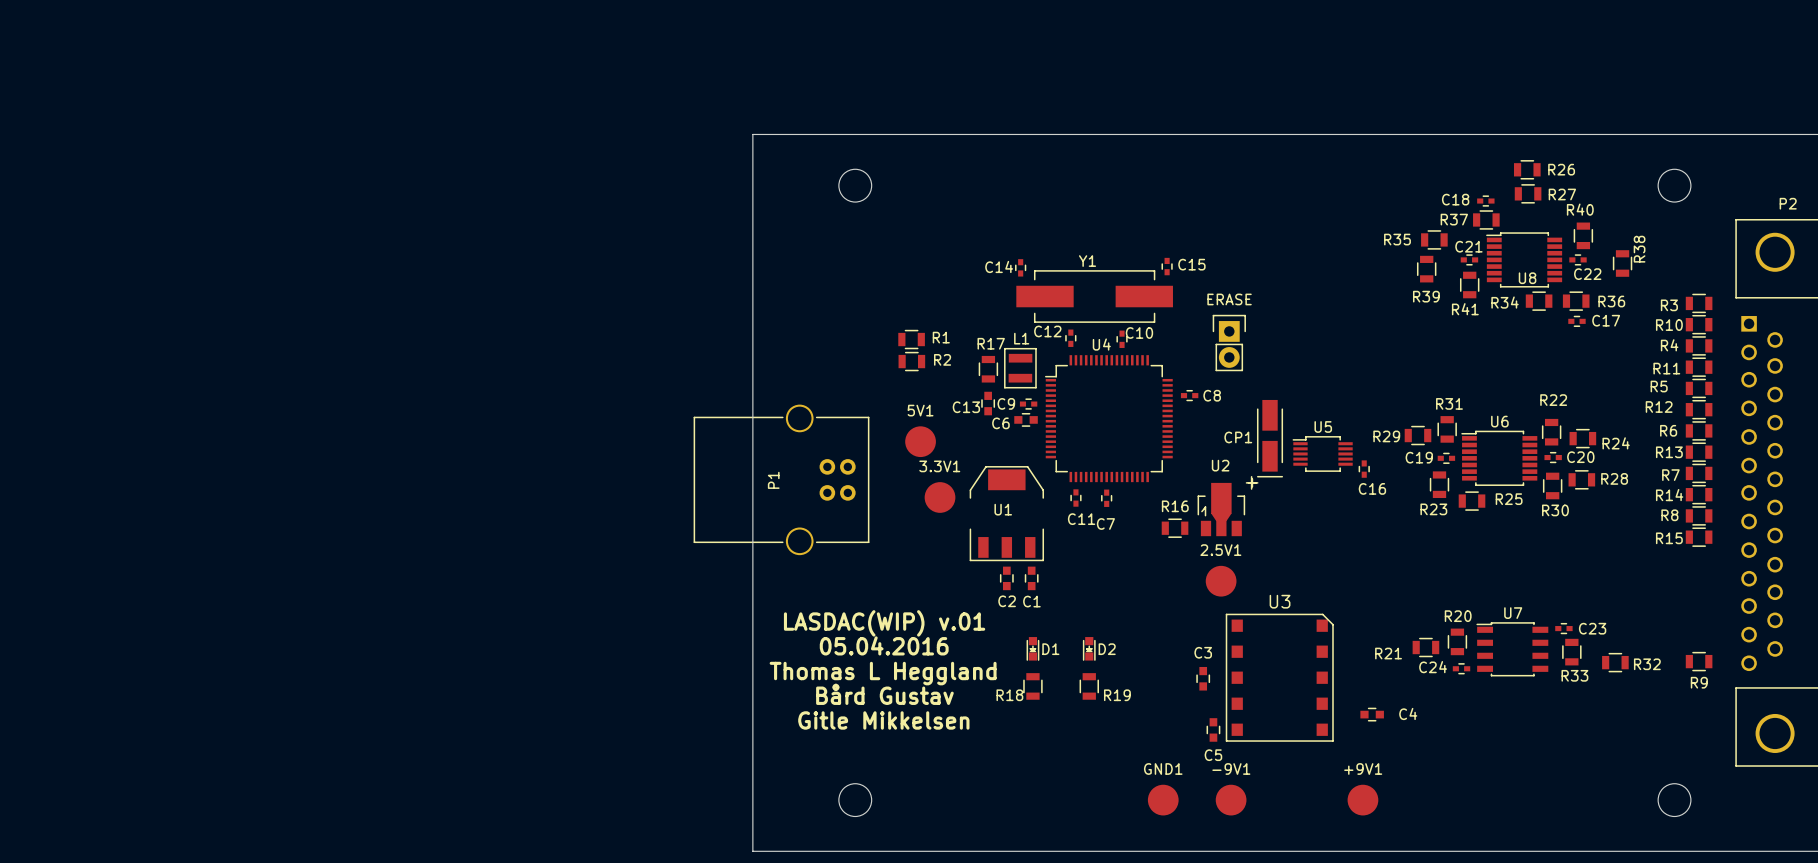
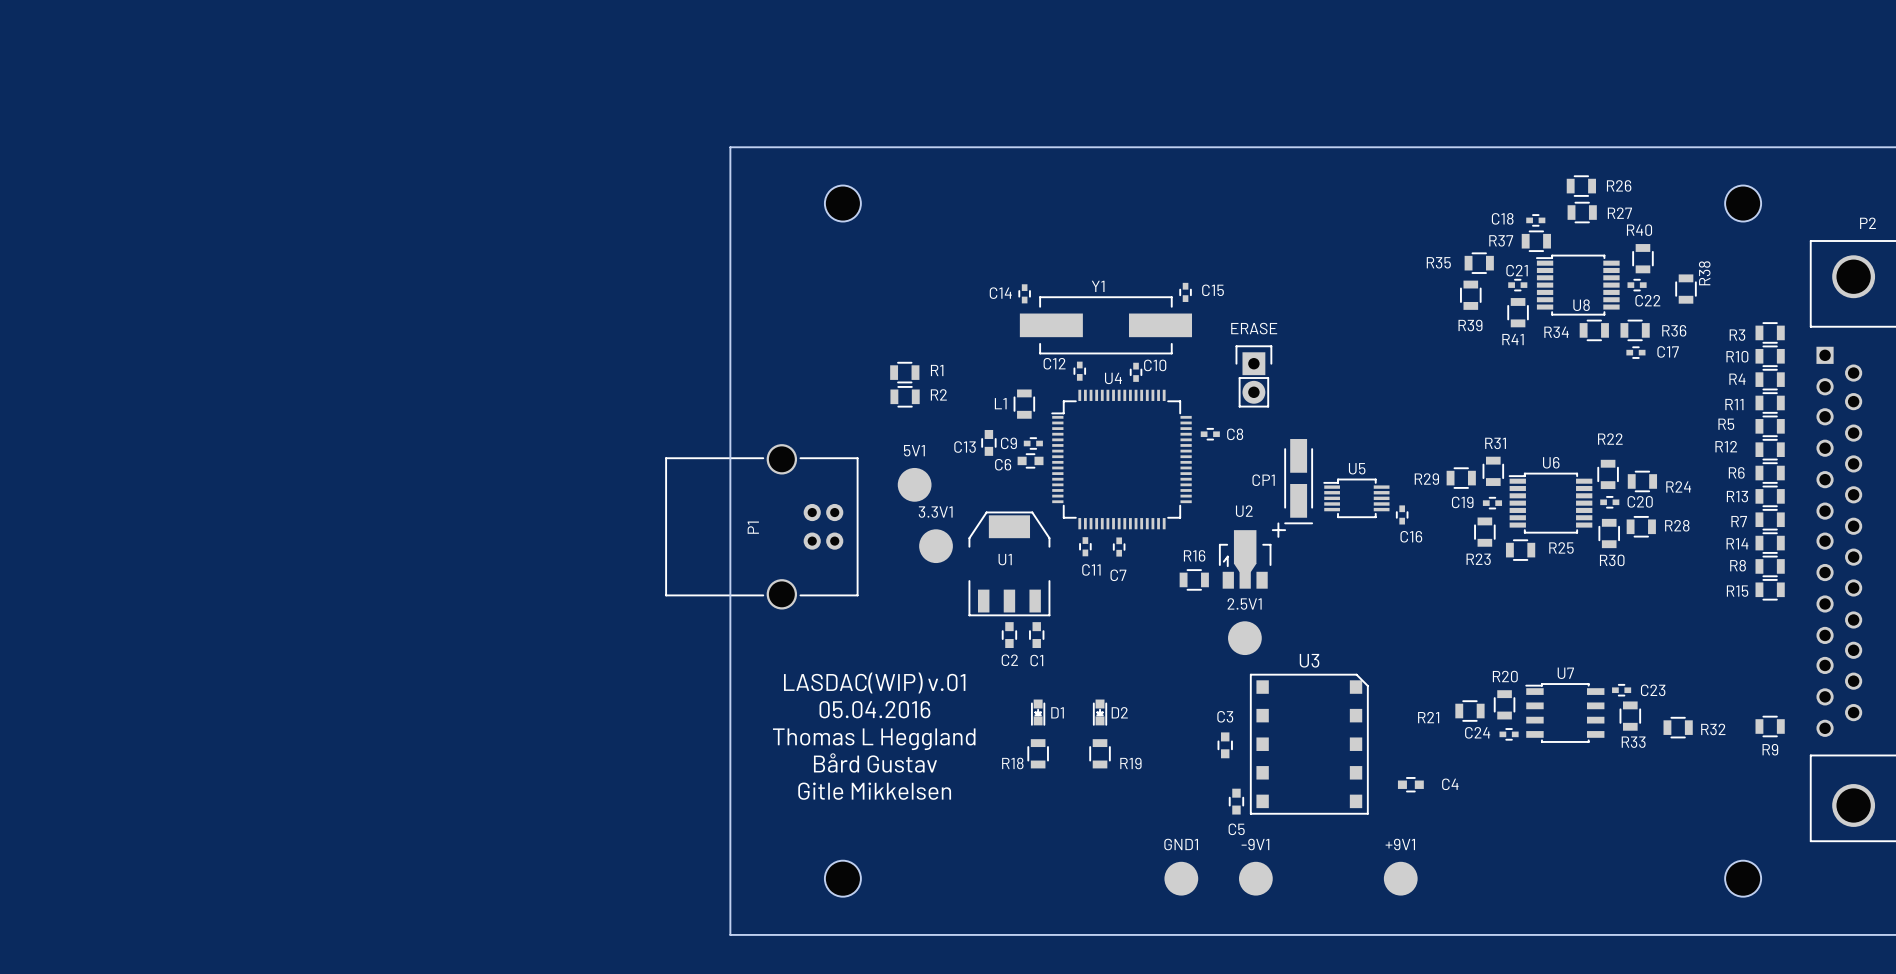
L1 name position: L1 (1021, 338) -> L1 (1000, 403)
L1 footprint: [1004, 347, 1037, 389] -> [1013, 389, 1036, 419]
R17: (988, 369) -> none

